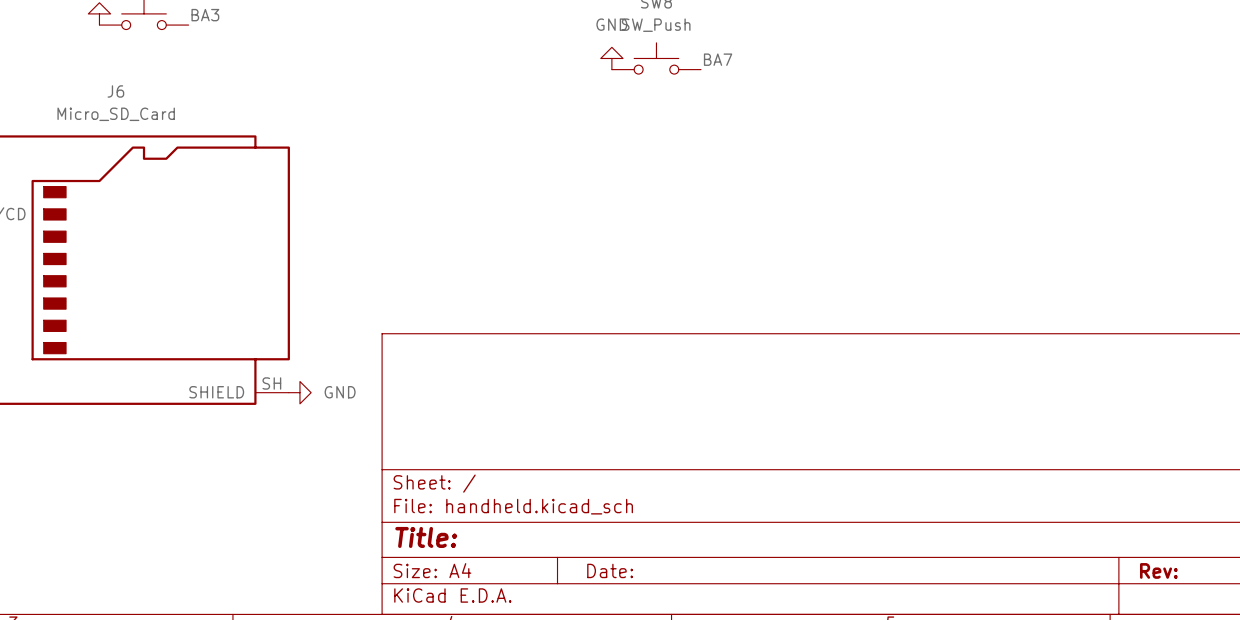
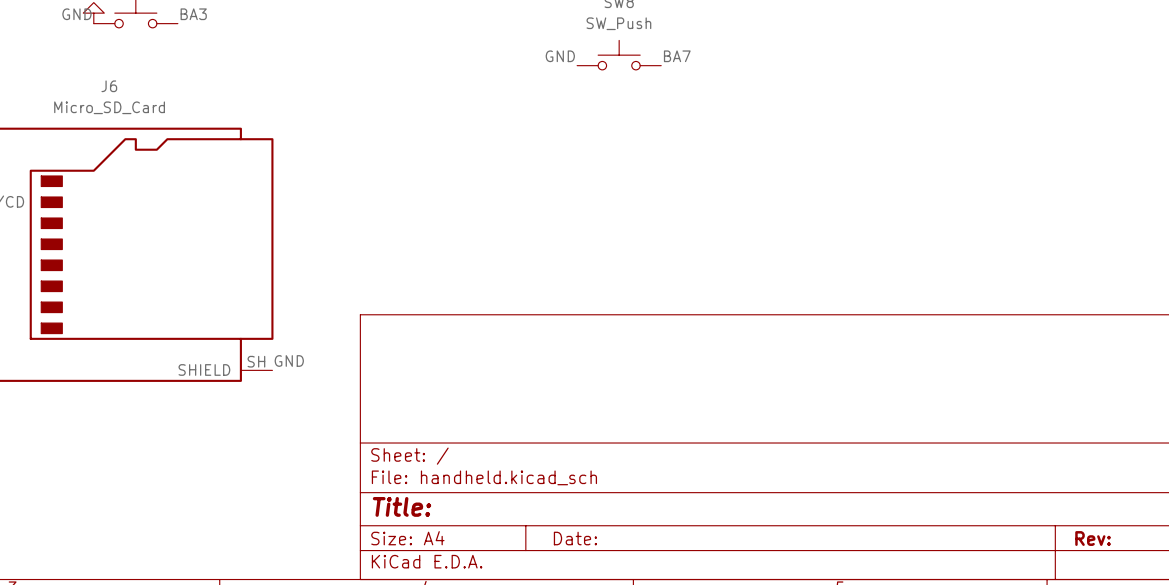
label: none -> GND (76, 14)
power symbol: GND (611, 58) -> none
label: none -> GND (560, 56)
label: none -> GND (289, 360)
power symbol: GND (299, 392) -> none

